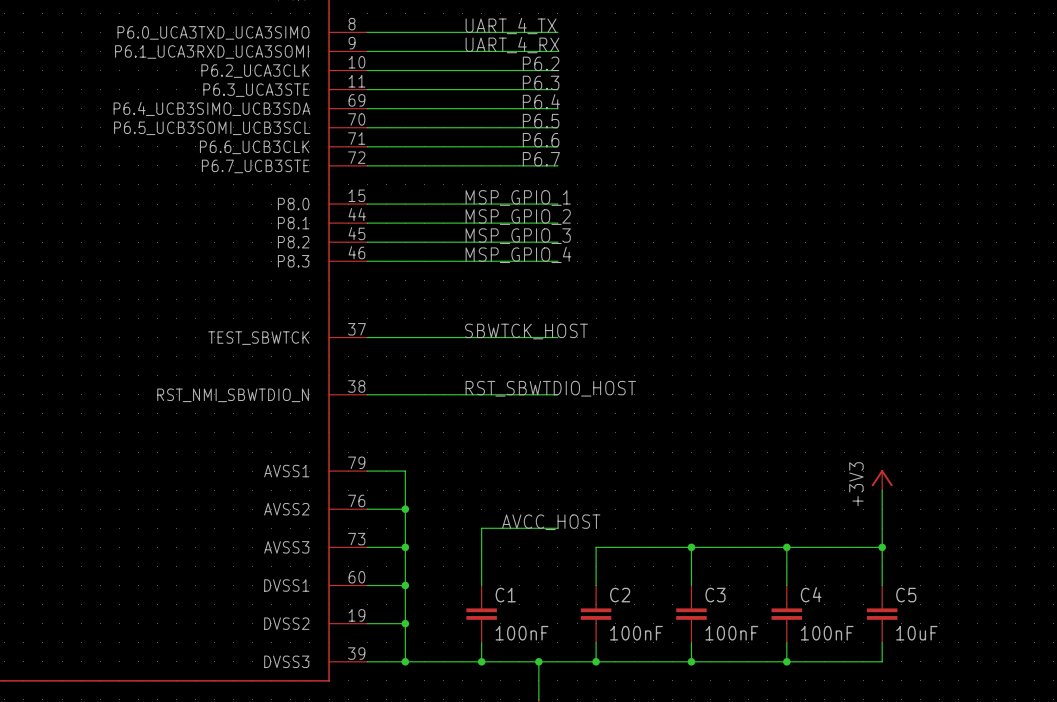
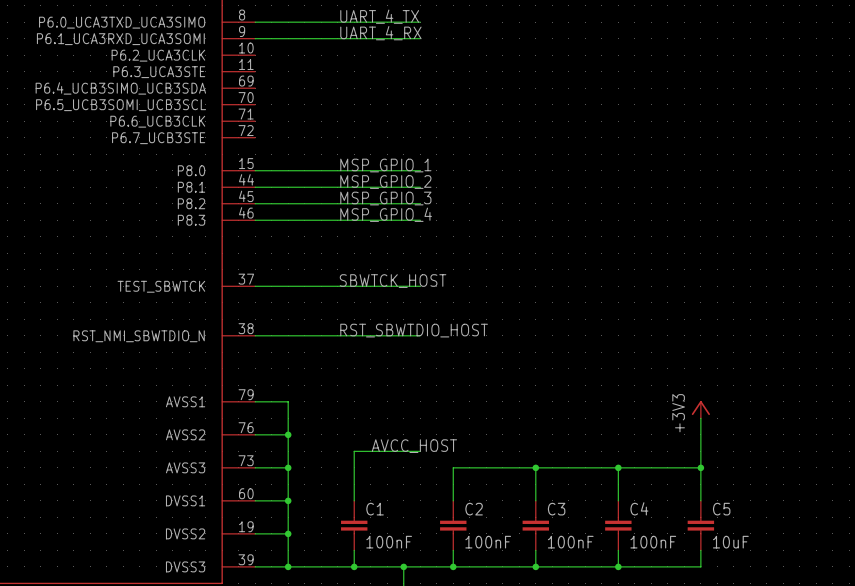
label: P6.2 (541, 63) -> none
wire: (367, 70) (557, 70) -> none
label: P6.3 (541, 82) -> none
wire: (367, 89) (557, 89) -> none
label: P6.4 (541, 101) -> none
wire: (367, 108) (557, 108) -> none
label: P6.5 (541, 121) -> none
wire: (367, 127) (557, 127) -> none
label: P6.6 (541, 140) -> none
wire: (367, 146) (557, 146) -> none
label: P6.7 (541, 159) -> none
wire: (367, 165) (557, 165) -> none

